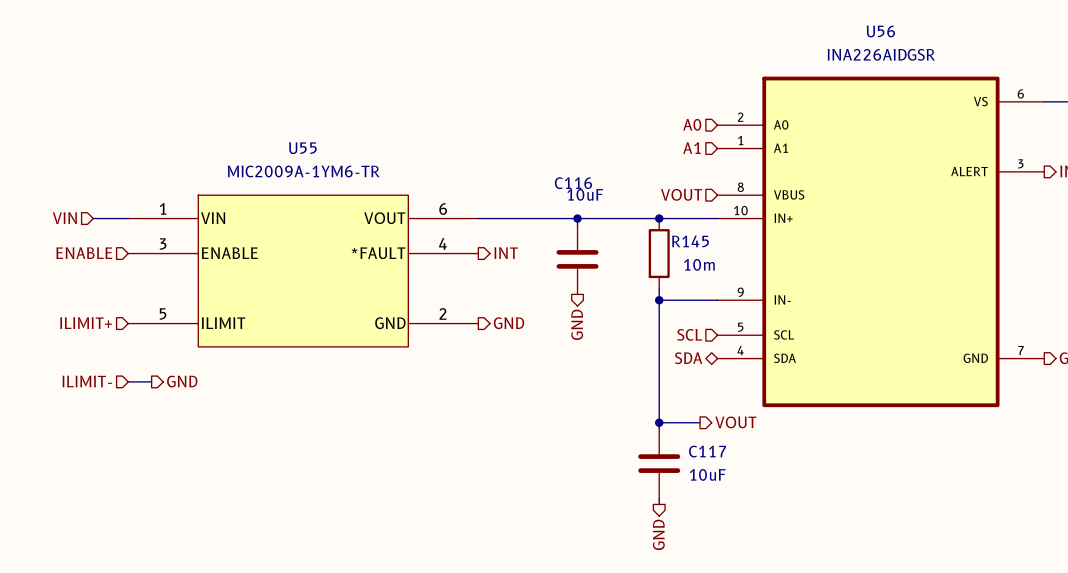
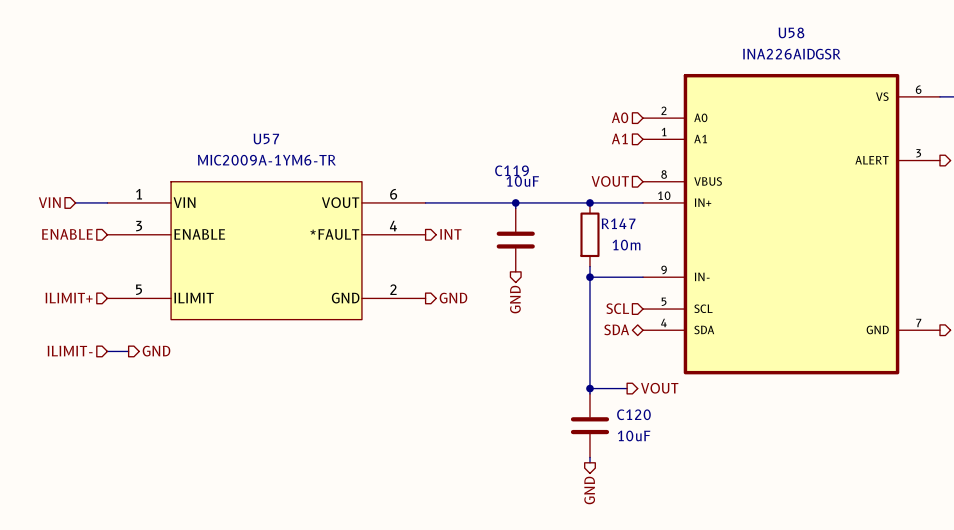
U56 name: U56 (880, 31) -> U58 (791, 32)
U55 name: U55 (302, 148) -> U57 (266, 138)
C116 name: C116 (573, 183) -> C119 (512, 170)
R145 name: R145 (690, 241) -> R147 (618, 223)
C117 name: C117 (707, 451) -> C120 (633, 414)

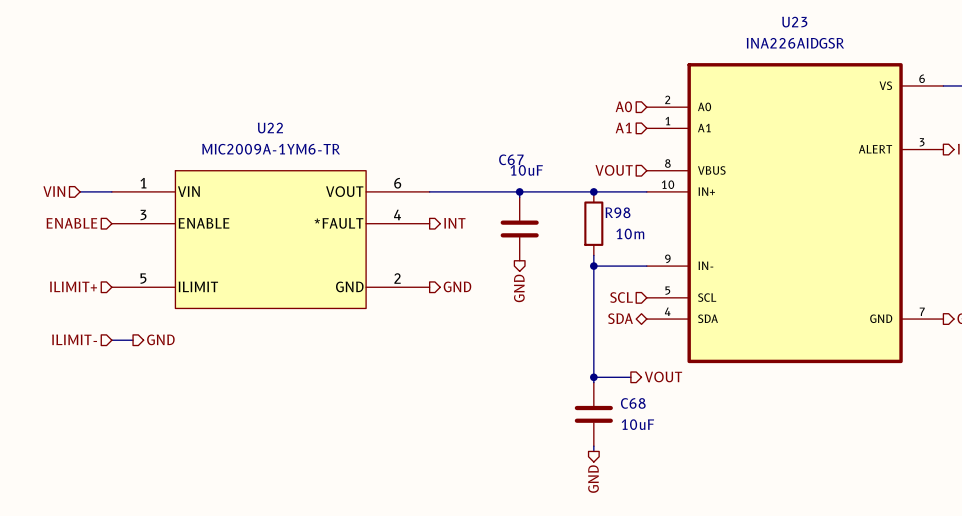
U58 name: U58 (791, 32) -> U23 (794, 22)
U57 name: U57 (266, 138) -> U22 (270, 128)
C119 name: C119 (512, 170) -> C67 (511, 159)
R147 name: R147 (618, 223) -> R98 (617, 212)
C120 name: C120 (633, 414) -> C68 (633, 403)

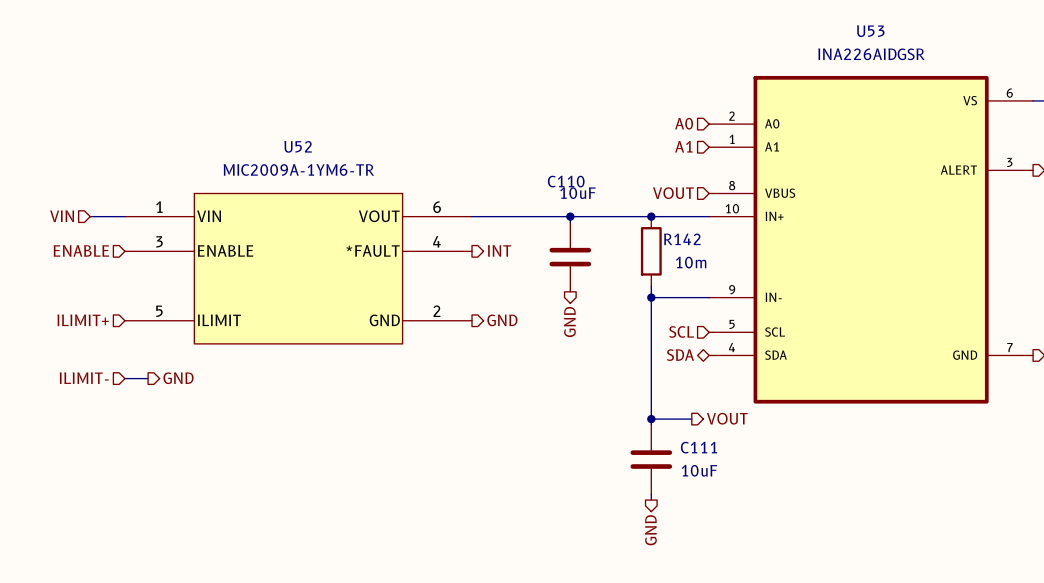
U23 name: U23 (794, 22) -> U53 (870, 31)
U22 name: U22 (270, 128) -> U52 (298, 146)
C67 name: C67 (511, 159) -> C110 (566, 181)
R98 name: R98 (617, 212) -> R142 (682, 239)
C68 name: C68 (633, 403) -> C111 (699, 447)

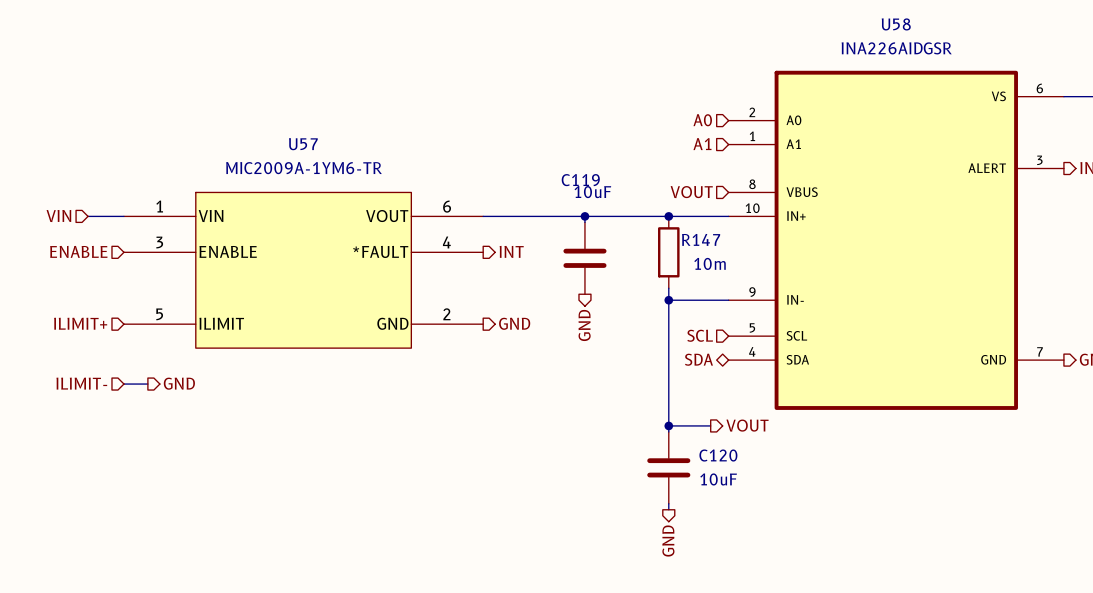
U53 name: U53 (870, 31) -> U58 (896, 24)
U52 name: U52 (298, 146) -> U57 (303, 144)
C110 name: C110 (566, 181) -> C119 (580, 180)
R142 name: R142 (682, 239) -> R147 (701, 239)
C111 name: C111 (699, 447) -> C120 (718, 455)

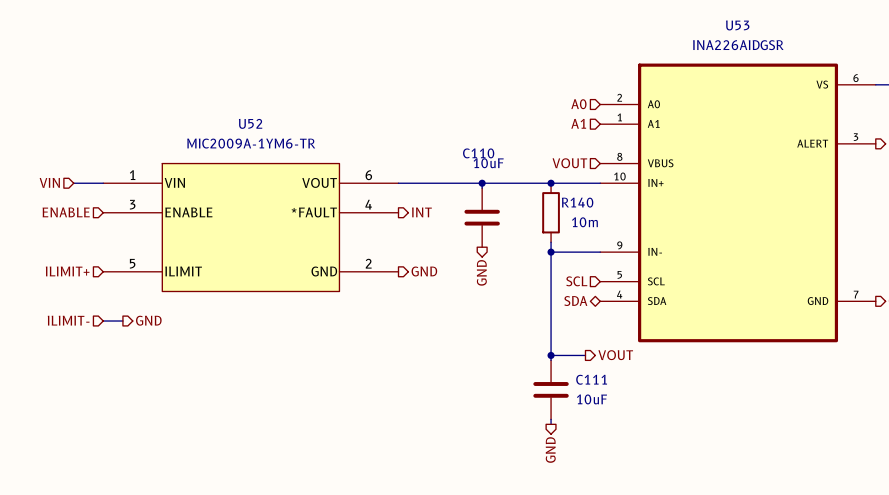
U58 name: U58 (896, 24) -> U53 (737, 25)
U57 name: U57 (303, 144) -> U52 (250, 123)
C119 name: C119 (580, 180) -> C110 (478, 153)
R147 name: R147 (701, 239) -> R140 (577, 202)
C120 name: C120 (718, 455) -> C111 (591, 379)

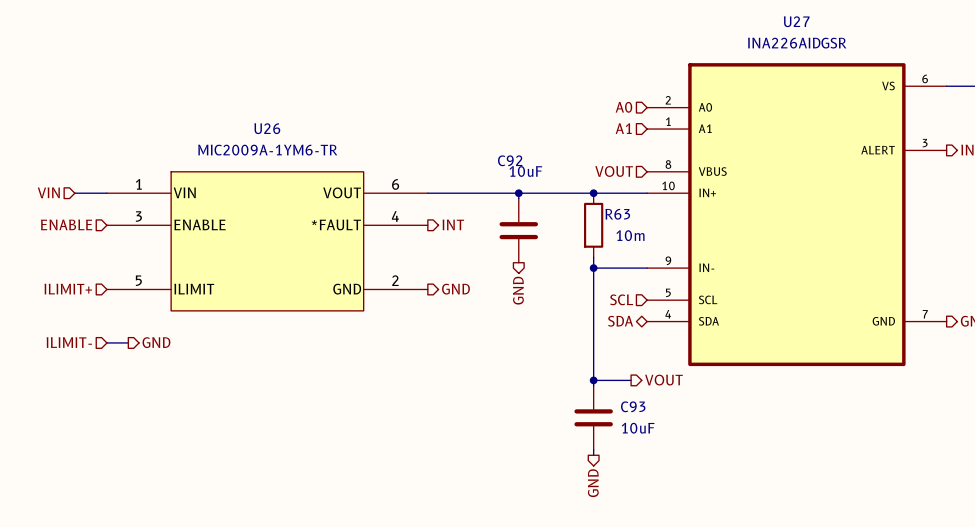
U53 name: U53 (737, 25) -> U27 (796, 21)
U52 name: U52 (250, 123) -> U26 (267, 128)
C110 name: C110 (478, 153) -> C92 (510, 160)
R140 name: R140 (577, 202) -> R63 (617, 214)
C111 name: C111 (591, 379) -> C93 (633, 406)

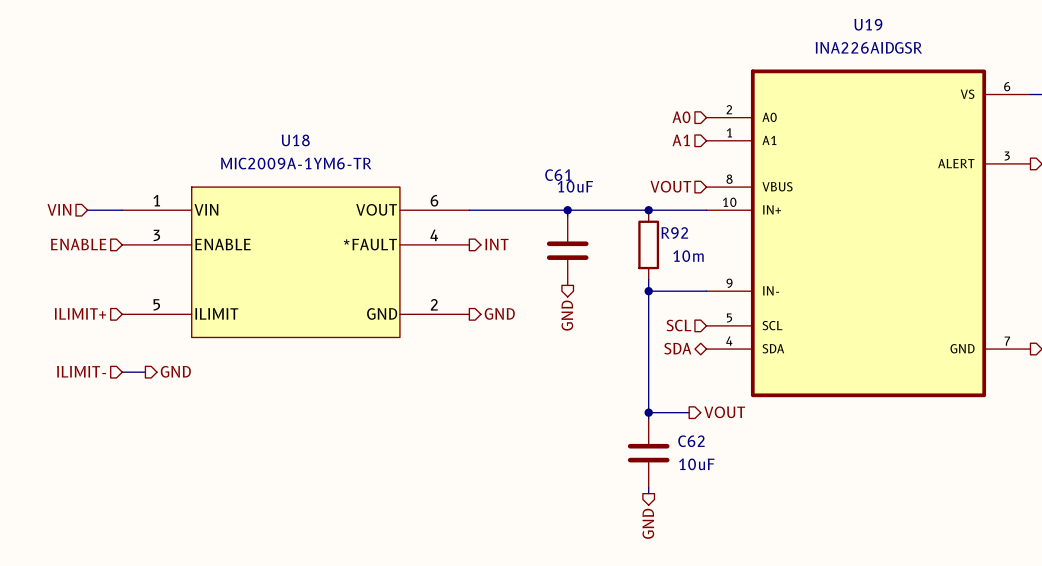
U27 name: U27 (796, 21) -> U19 (868, 24)
U26 name: U26 (267, 128) -> U18 (295, 140)
C92 name: C92 (510, 160) -> C61 (558, 175)
R63 name: R63 (617, 214) -> R92 (674, 232)
C93 name: C93 (633, 406) -> C62 (691, 441)

